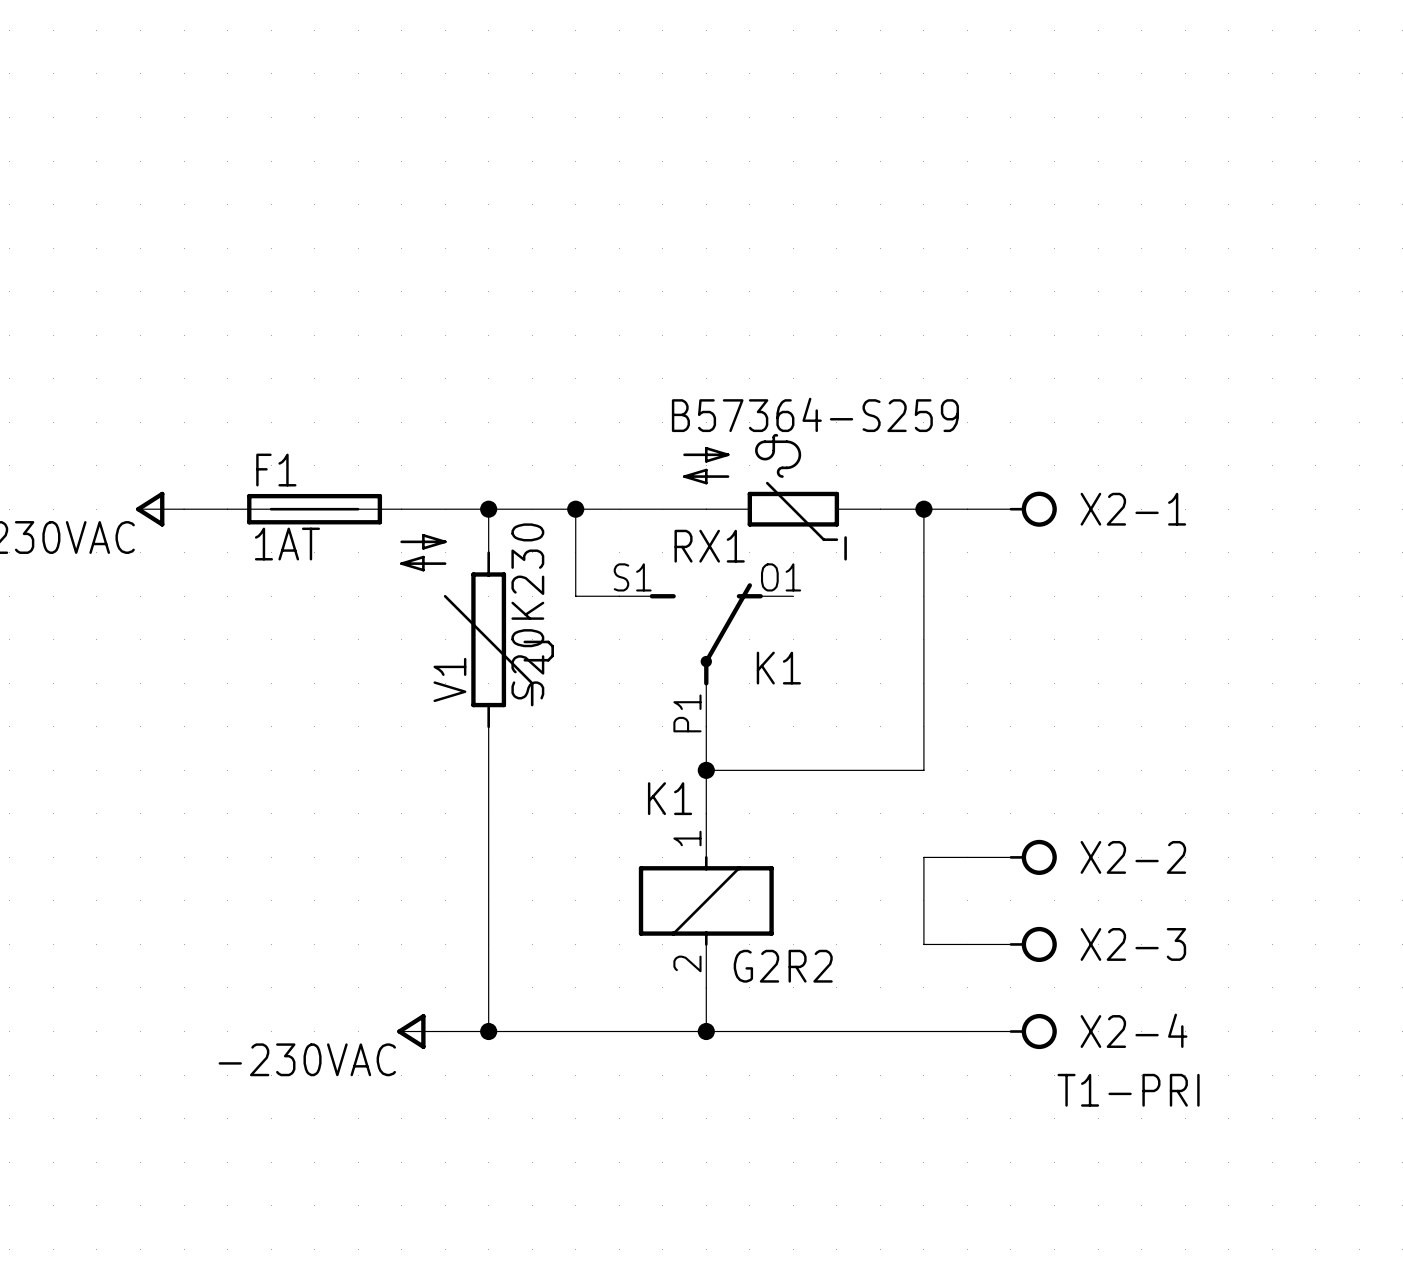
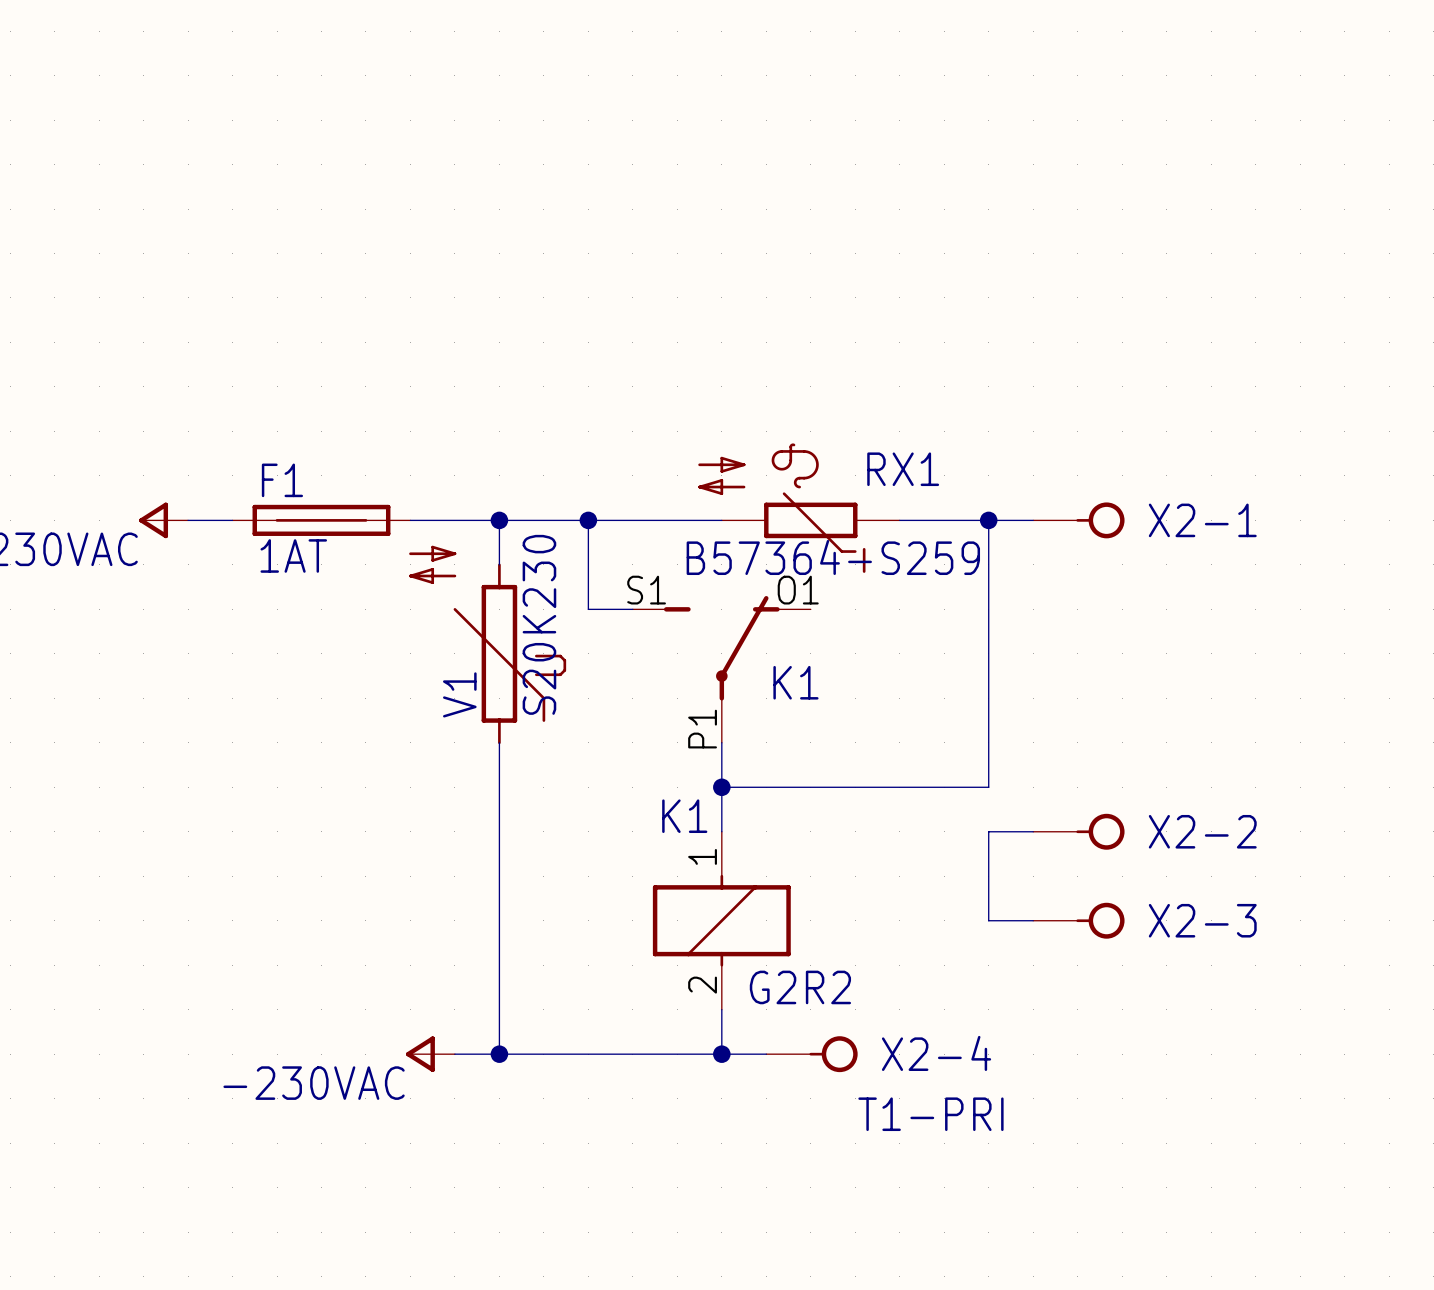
RX1 value position: B57364-S259 (815, 414) -> B57364-S259 (833, 557)
wire: (923, 509) (923, 770) -> (1033, 520) (988, 520) (988, 787) (944, 787)
junction position: (923, 509) -> (988, 520)
X2-1 position: (1012, 509) -> (1078, 520)
RX1 name position: RX1 (709, 546) -> RX1 (903, 469)
wire: (967, 857) (923, 857) (923, 944) (967, 944) -> (1033, 831) (988, 831) (988, 920) (1033, 920)
X2-2 position: (1012, 857) -> (1078, 831)
X2-3 position: (1012, 944) -> (1078, 920)
wire: (749, 1031) (967, 1031) -> none
X2-4 position: (1012, 1031) -> (811, 1054)

